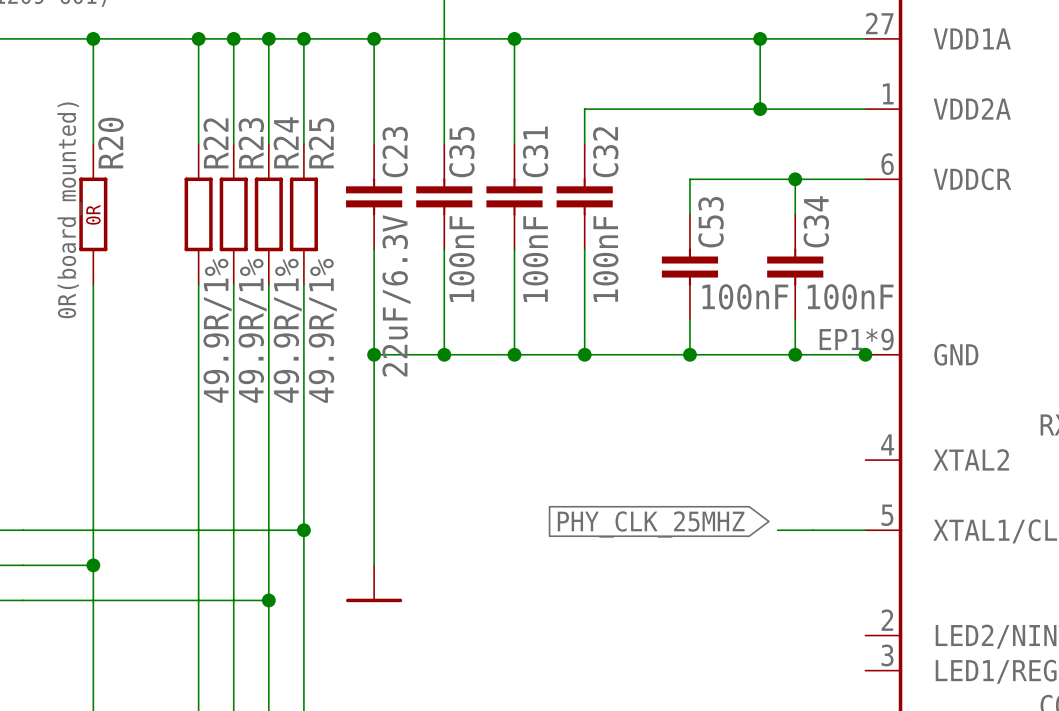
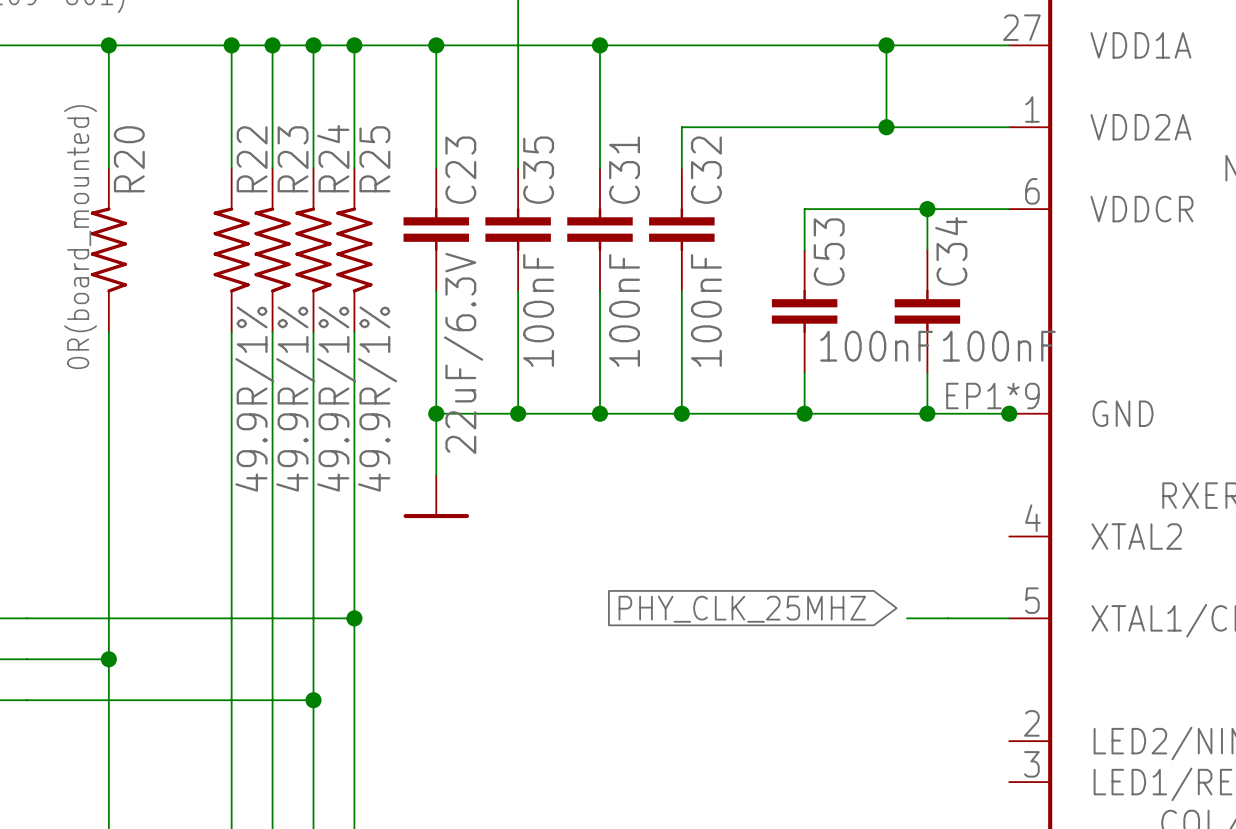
R20 symbol: [79, 144, 108, 285] -> [90, 168, 127, 332]
R22 symbol: [184, 144, 213, 285] -> [213, 168, 250, 332]
R23 symbol: [219, 144, 248, 285] -> [254, 168, 291, 332]
R24 symbol: [254, 144, 283, 285] -> [295, 168, 332, 332]
R25 symbol: [289, 144, 318, 285] -> [336, 168, 373, 332]
wire: (374, 407) (374, 565) -> none
power symbol position: (374, 583) -> (436, 496)

